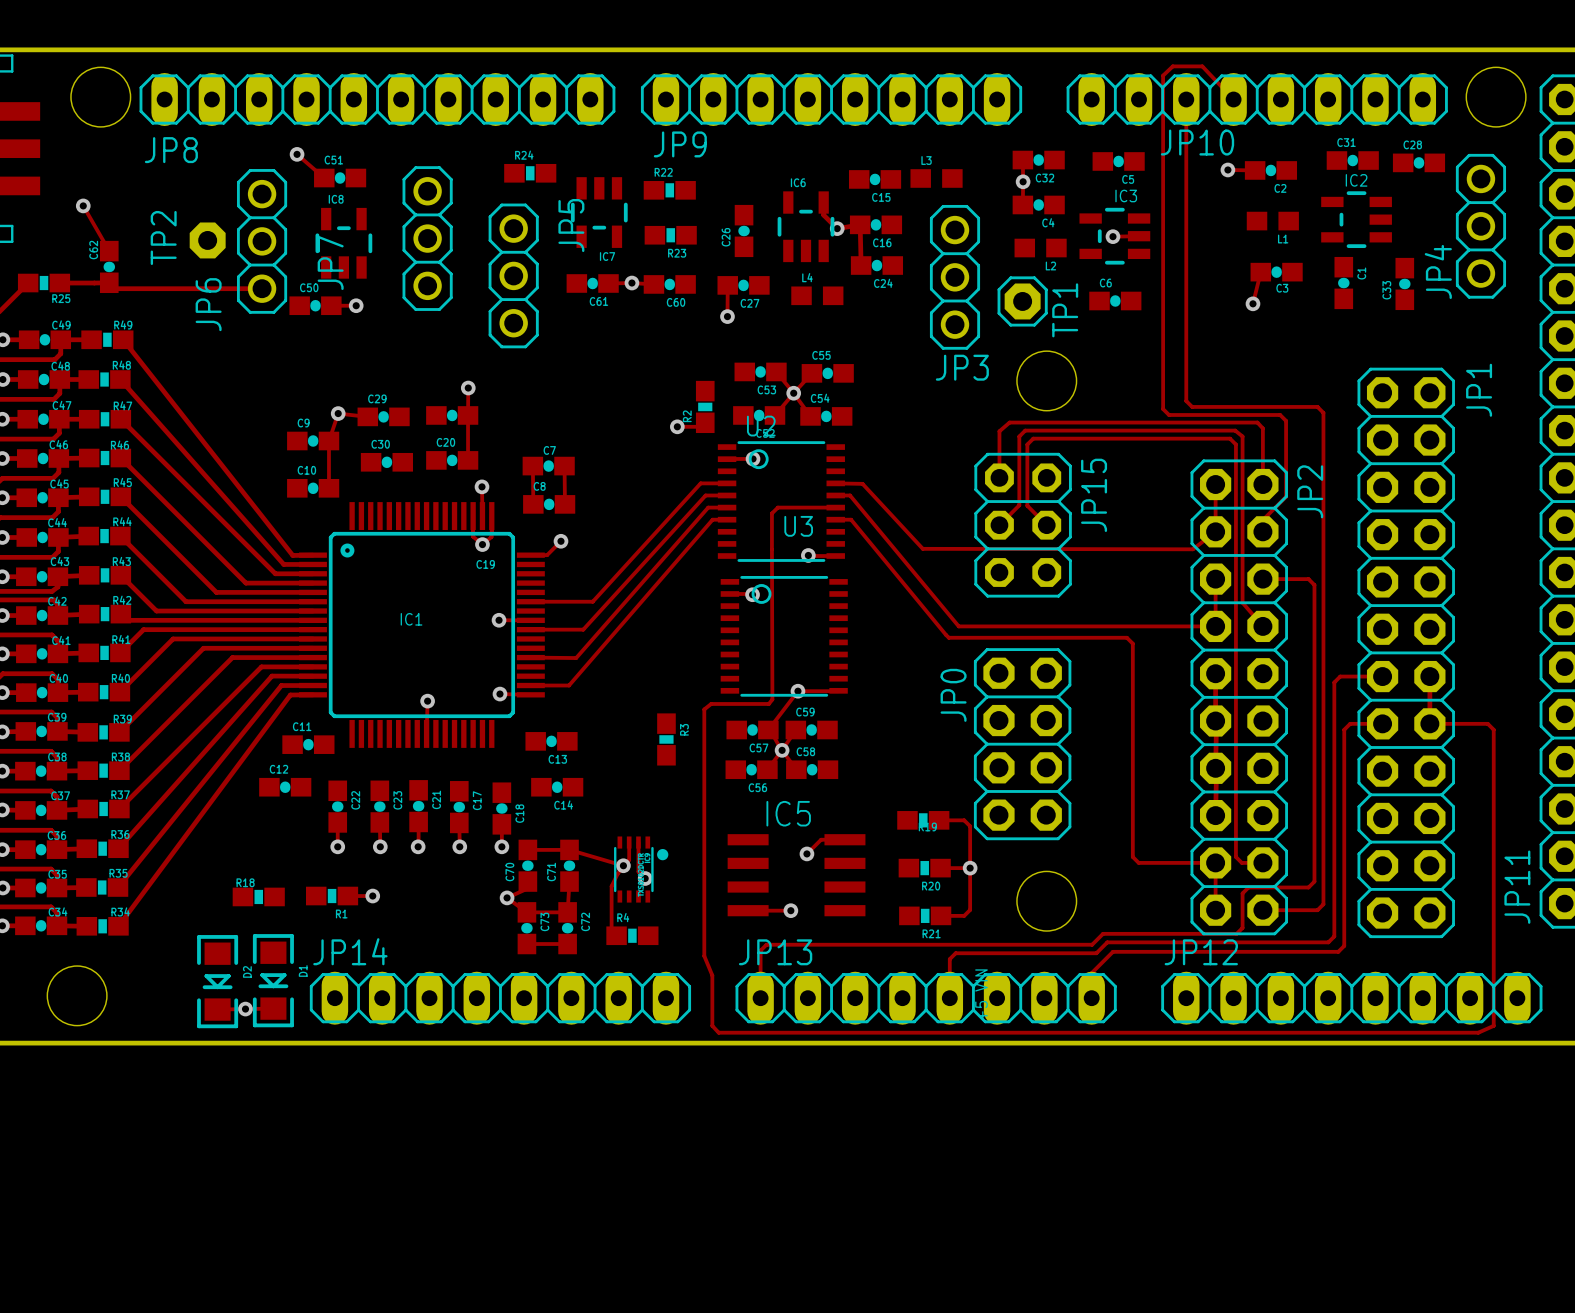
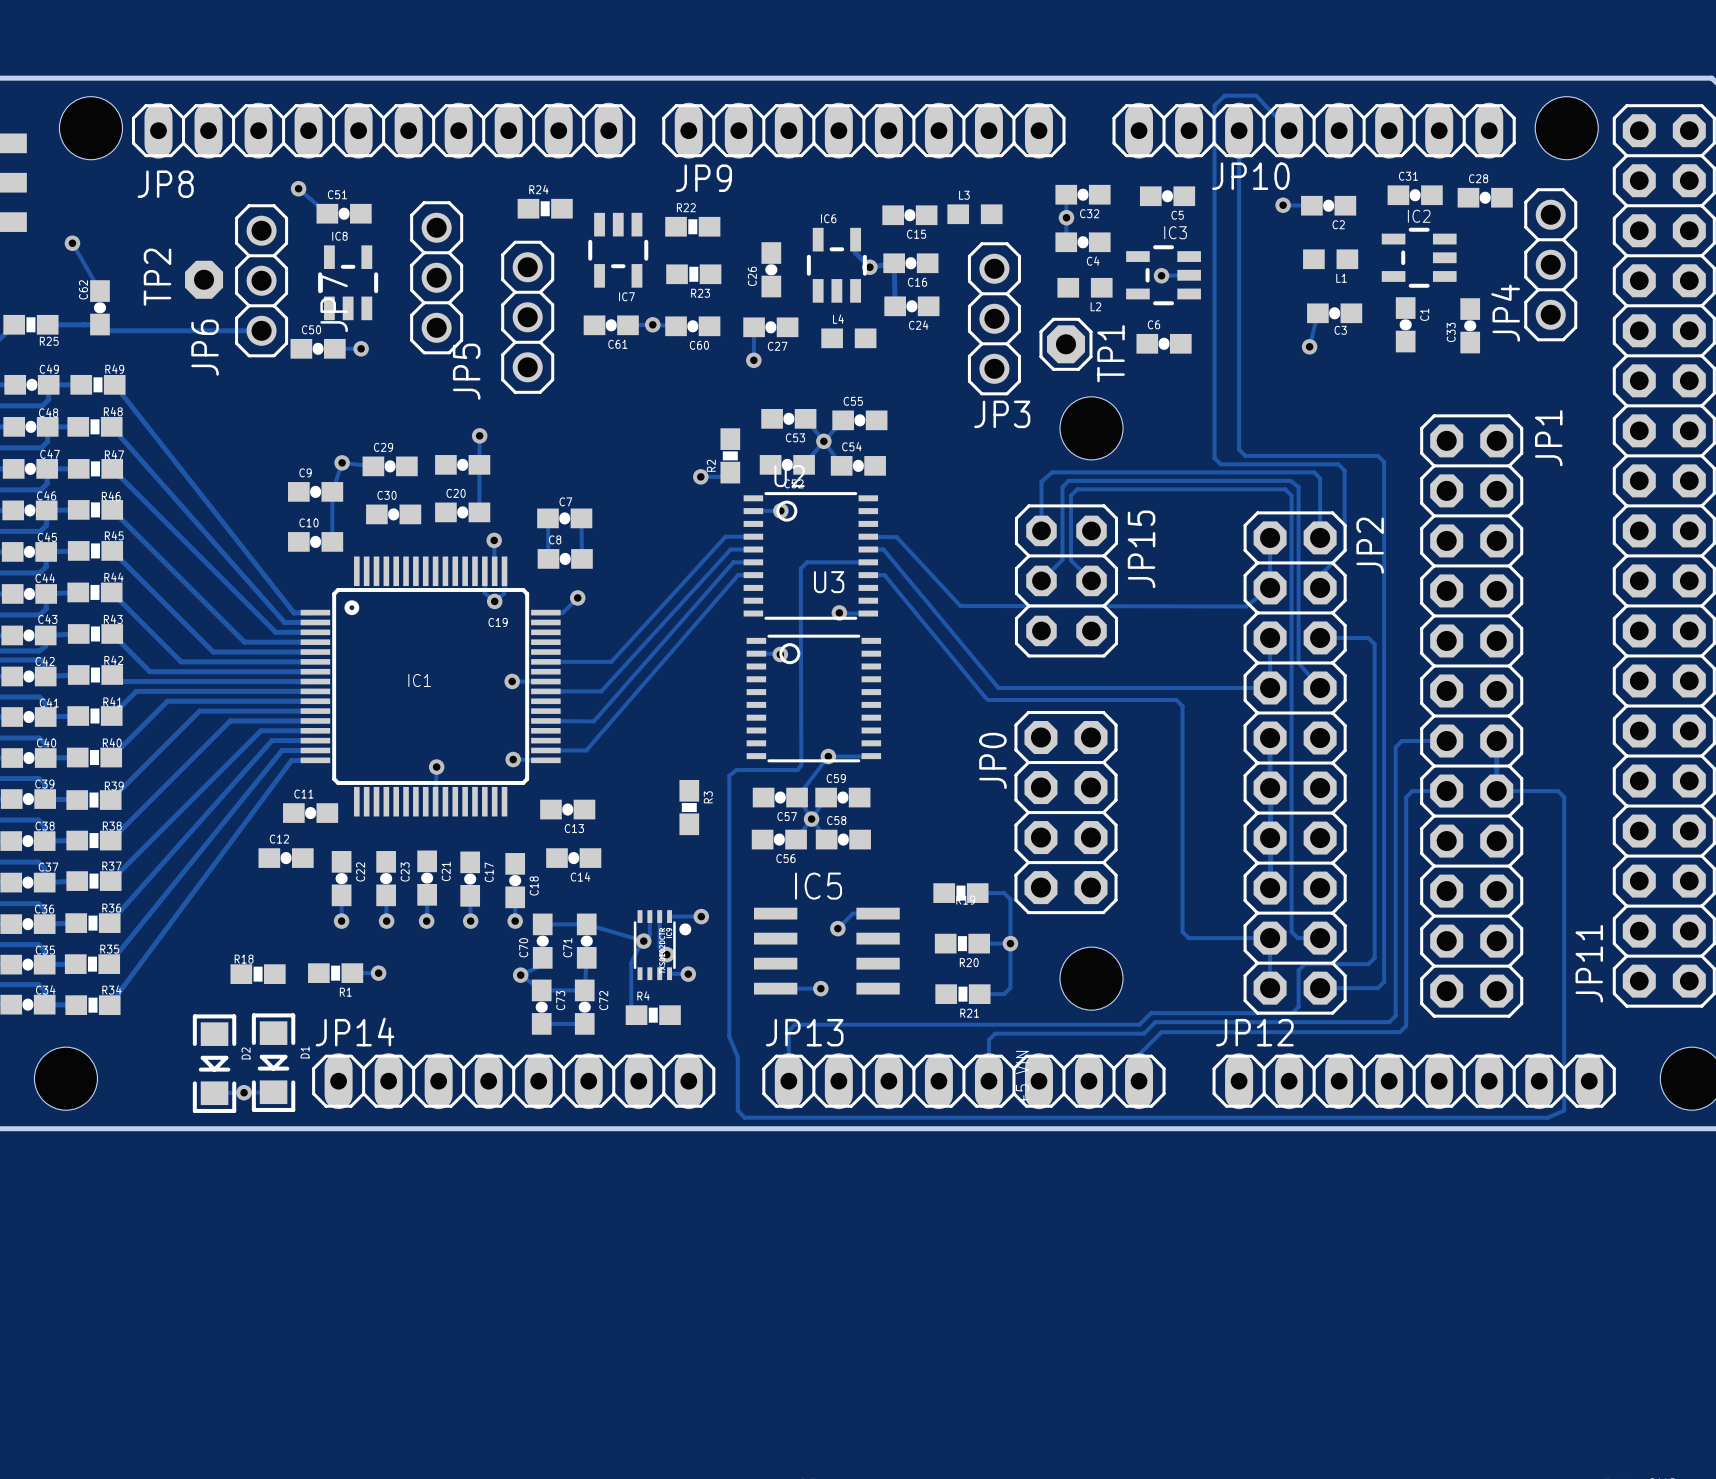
JP5 name position: JP5 (571, 225) -> JP5 (466, 371)
track: none -> (669, 916) (701, 916)
via: none -> (701, 916)
track: none -> (669, 973) (688, 974)
via: none -> (688, 974)

